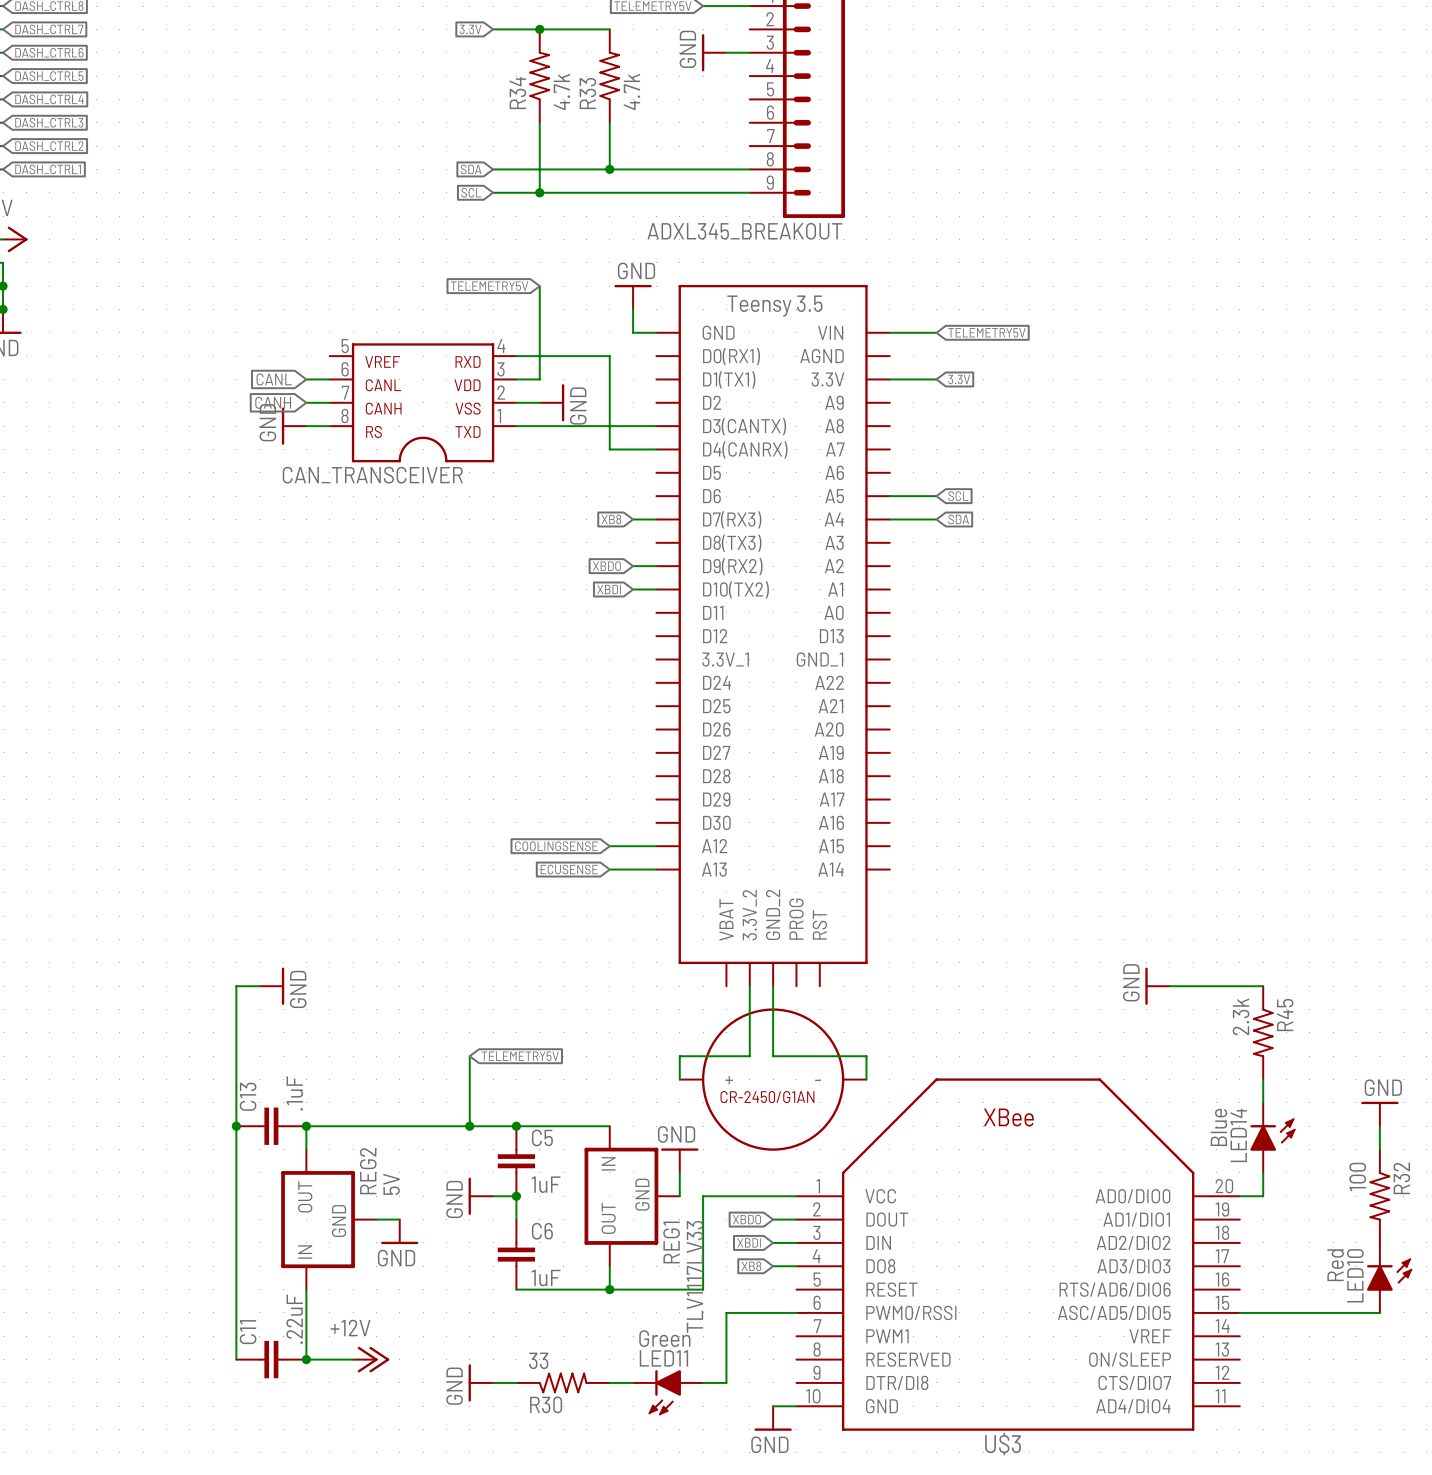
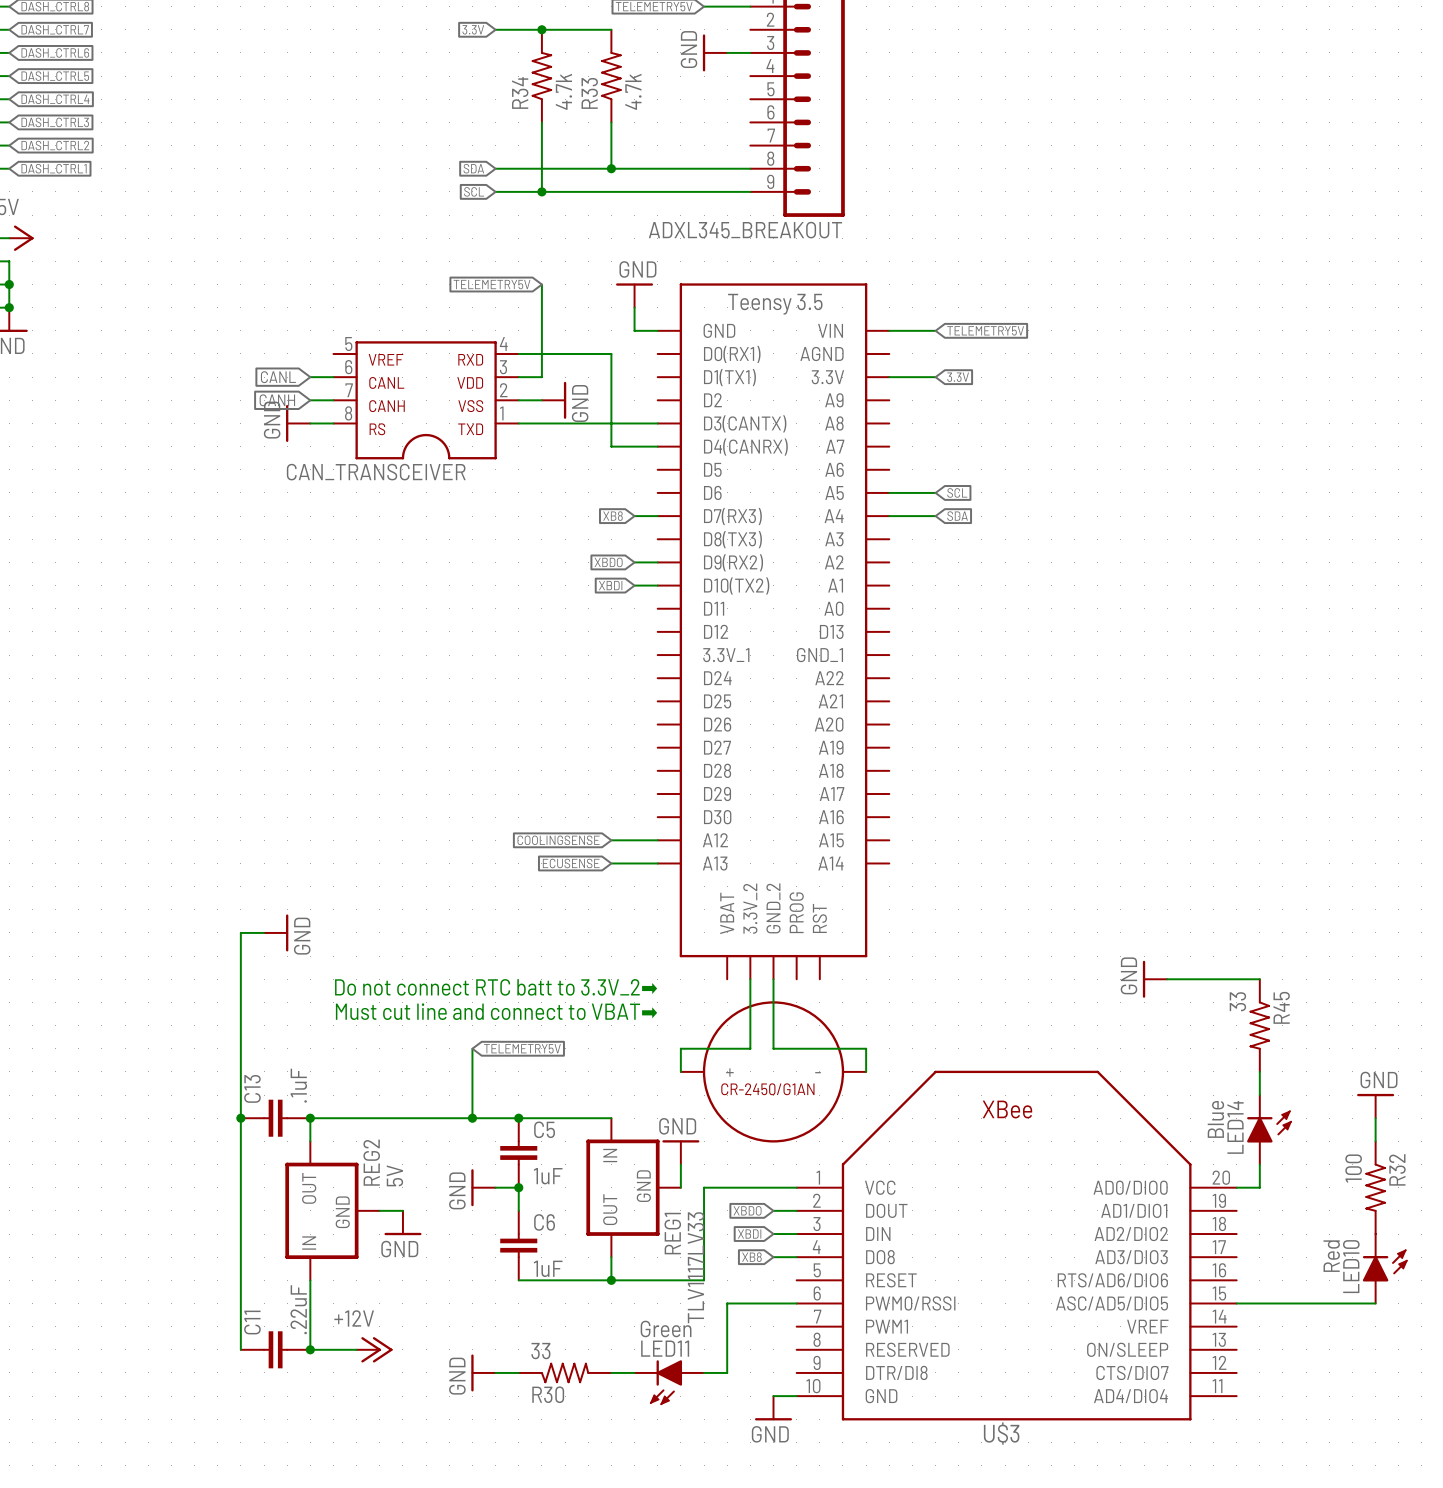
wire: (236, 986) (259, 986) -> (240, 979) (240, 932) (264, 932)
power symbol position: GND (271, 986) -> GND (276, 932)
text: none -> Do not connect RTC batt to 3.3V_2➡ (496, 987)
R45 value: 2.3k (1241, 1016) -> 33 (1237, 1001)
text: none -> Must cut line and connect to VBAT➡ (496, 1011)

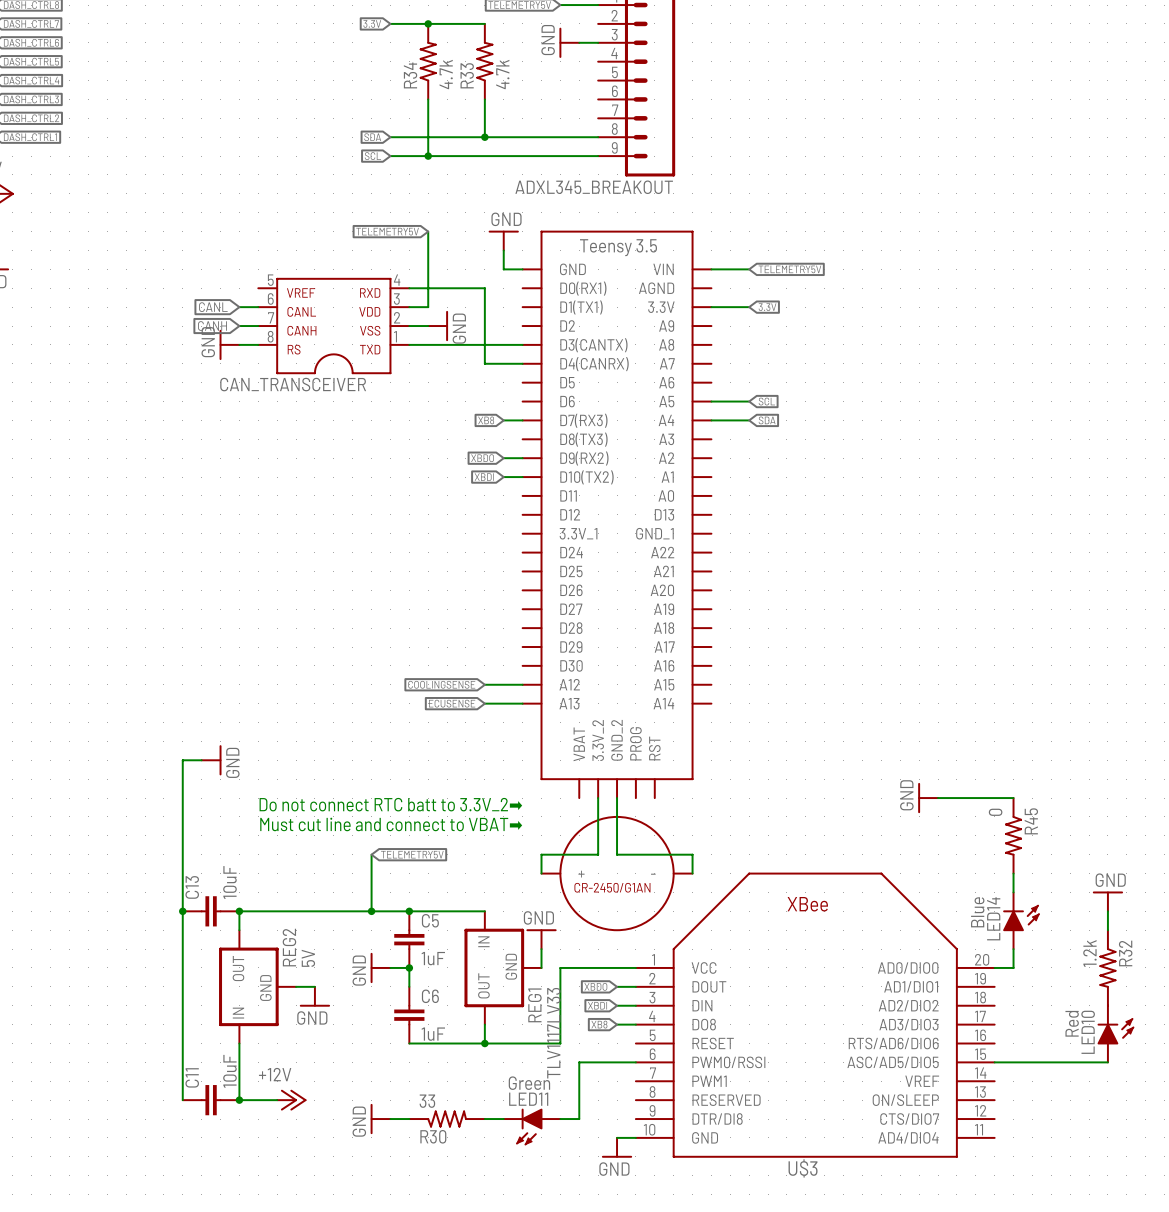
R45 value: 33 (1237, 1001) -> 0 (995, 812)
C13 value: .1uF (298, 1085) -> 10uF (229, 882)
R32 value: 100 (1353, 1168) -> 1.2k (1089, 953)
C11 value: .22uF (298, 1309) -> 10uF (229, 1071)

